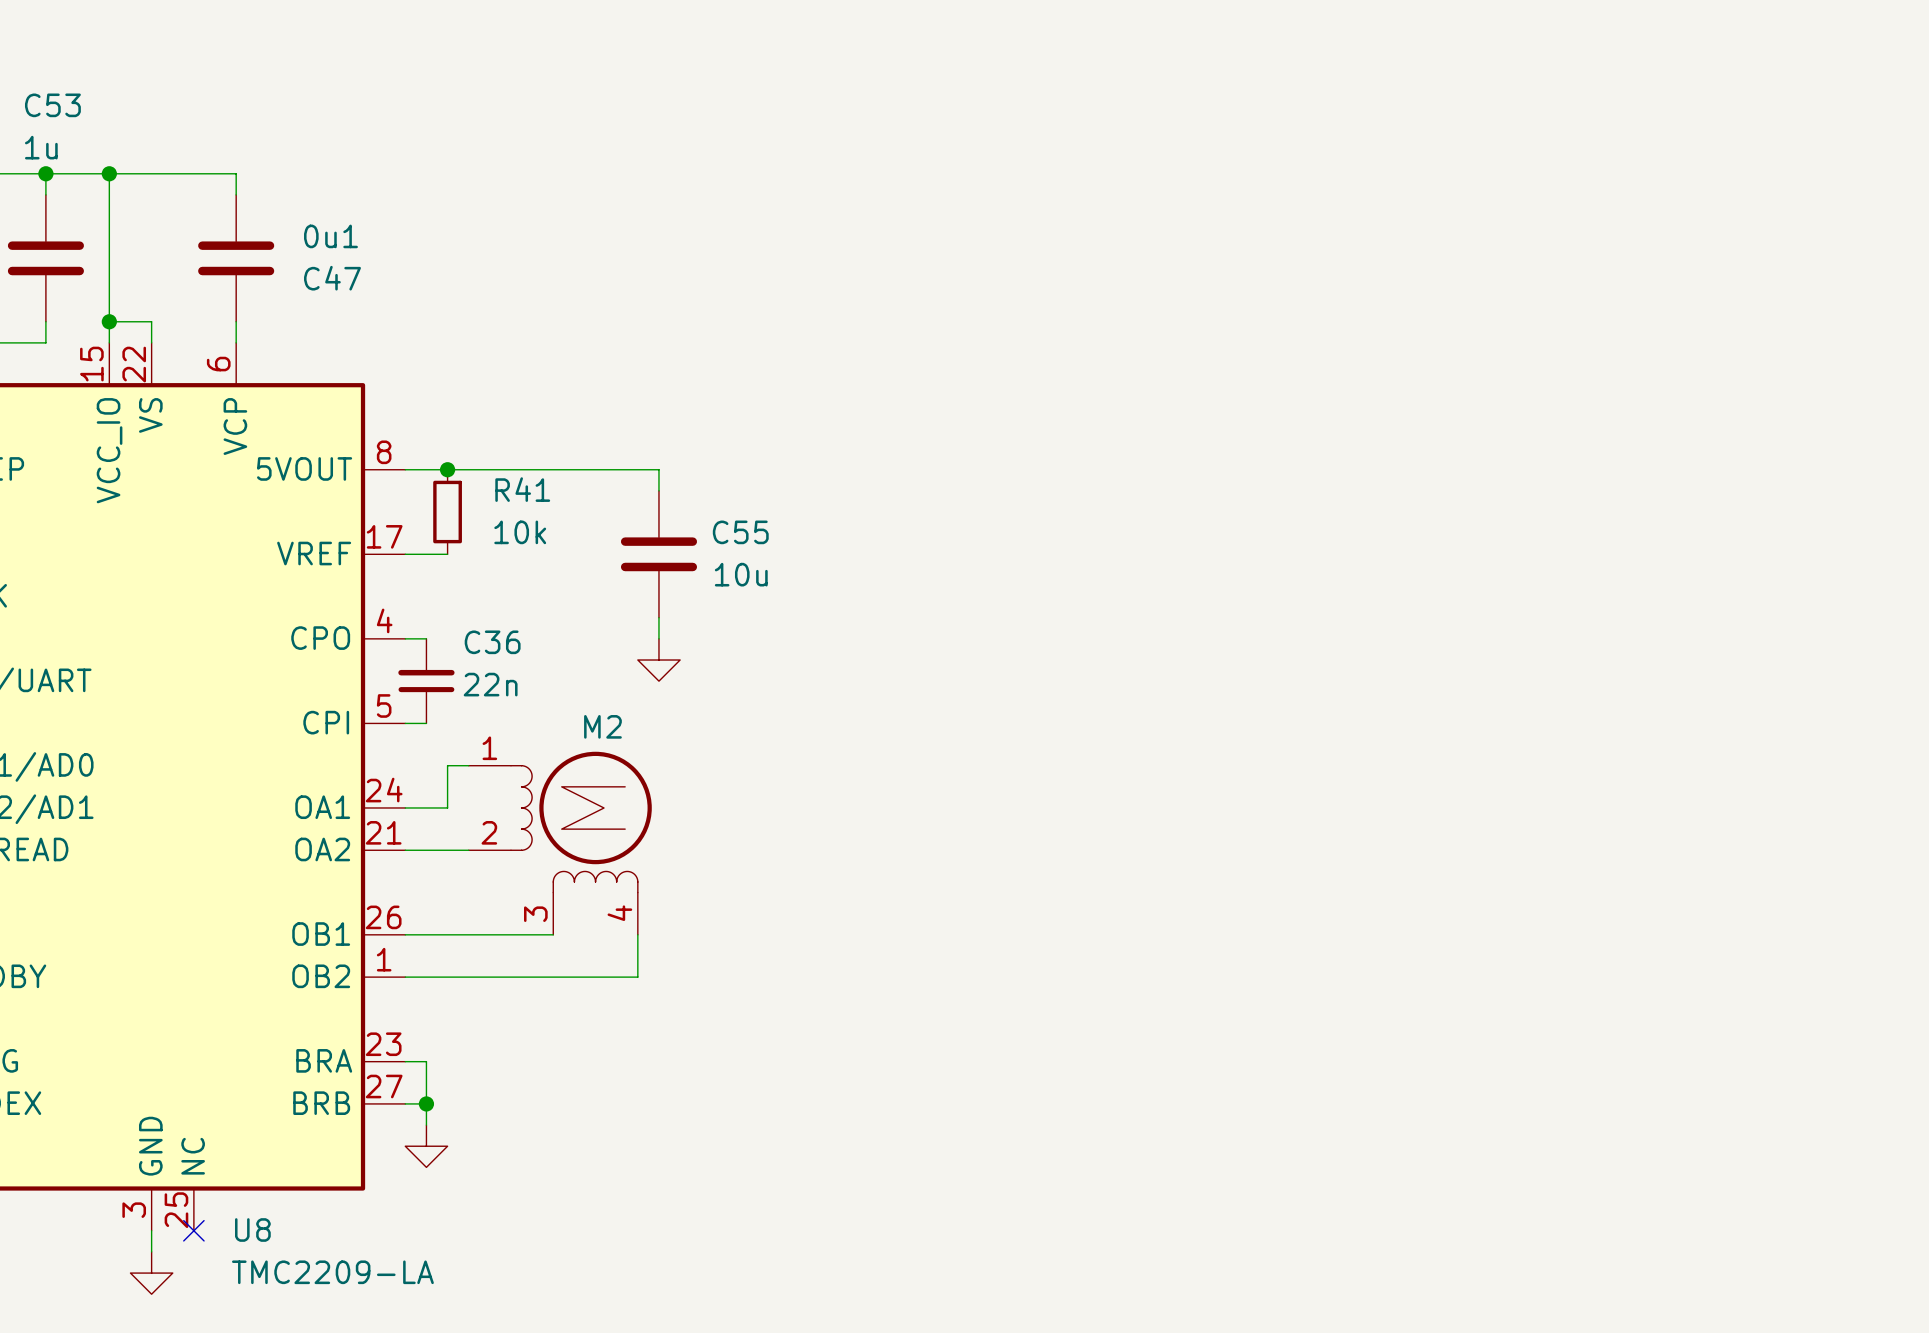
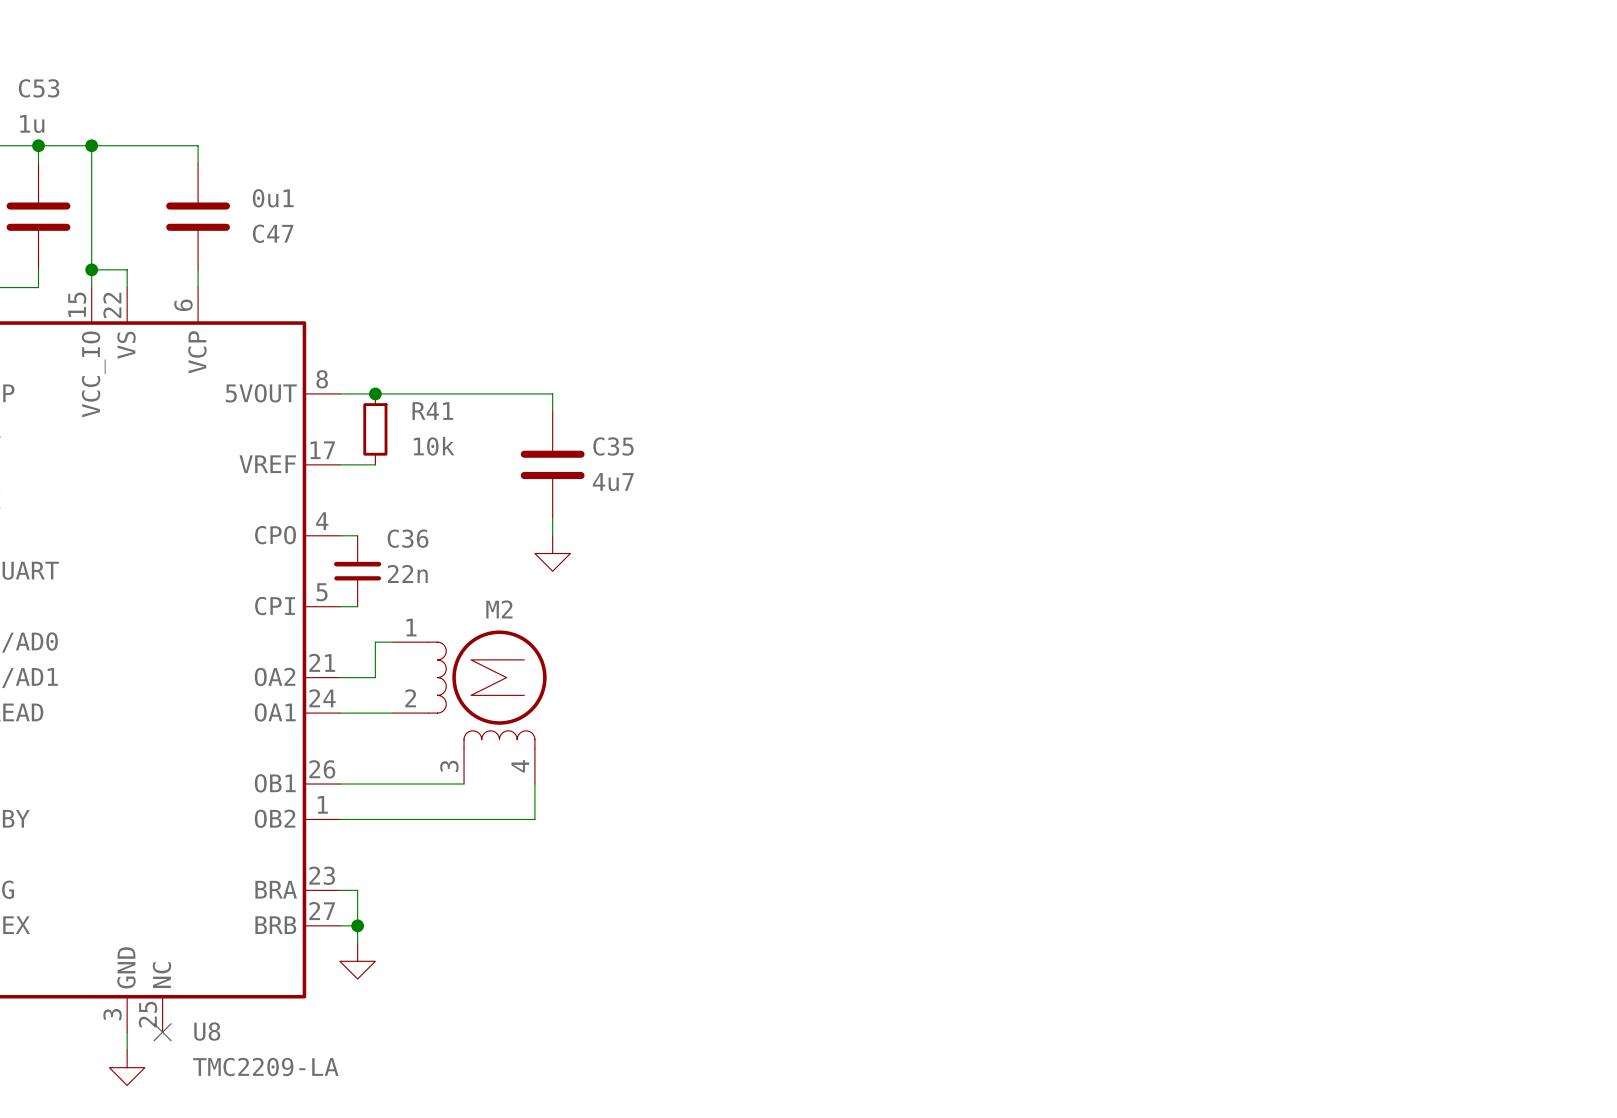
C55 name: C55 (740, 532) -> C35 (613, 446)
C55 value: 10u (741, 574) -> 4u7 (613, 482)
U8 pin number: 24 (384, 790) -> 21 (322, 662)
U8 pin name: OA1 (322, 807) -> OA2 (275, 676)
U8 pin number: 21 (383, 832) -> 24 (322, 698)
U8 pin name: OA2 (322, 849) -> OA1 (275, 712)

